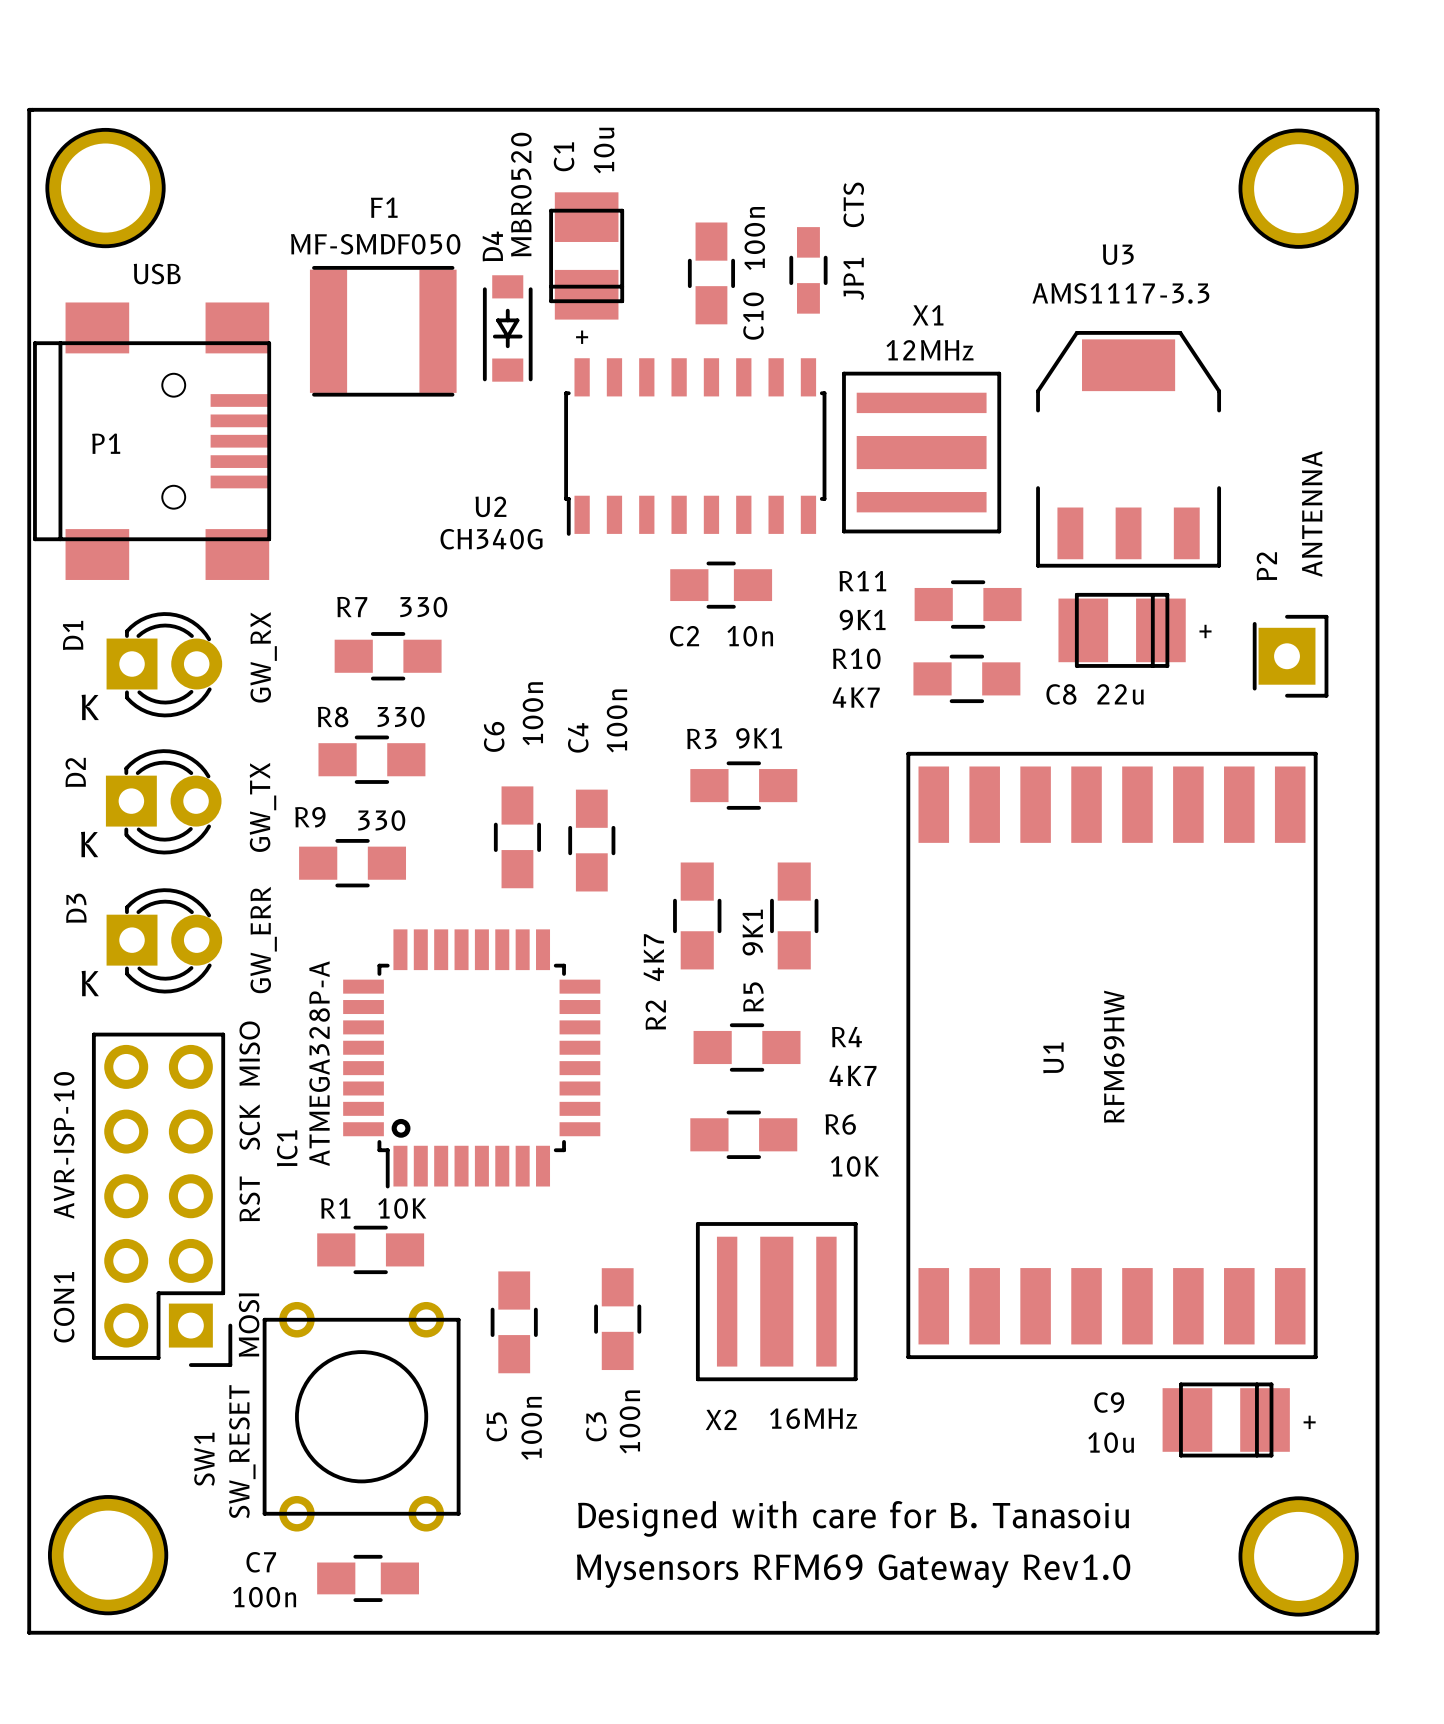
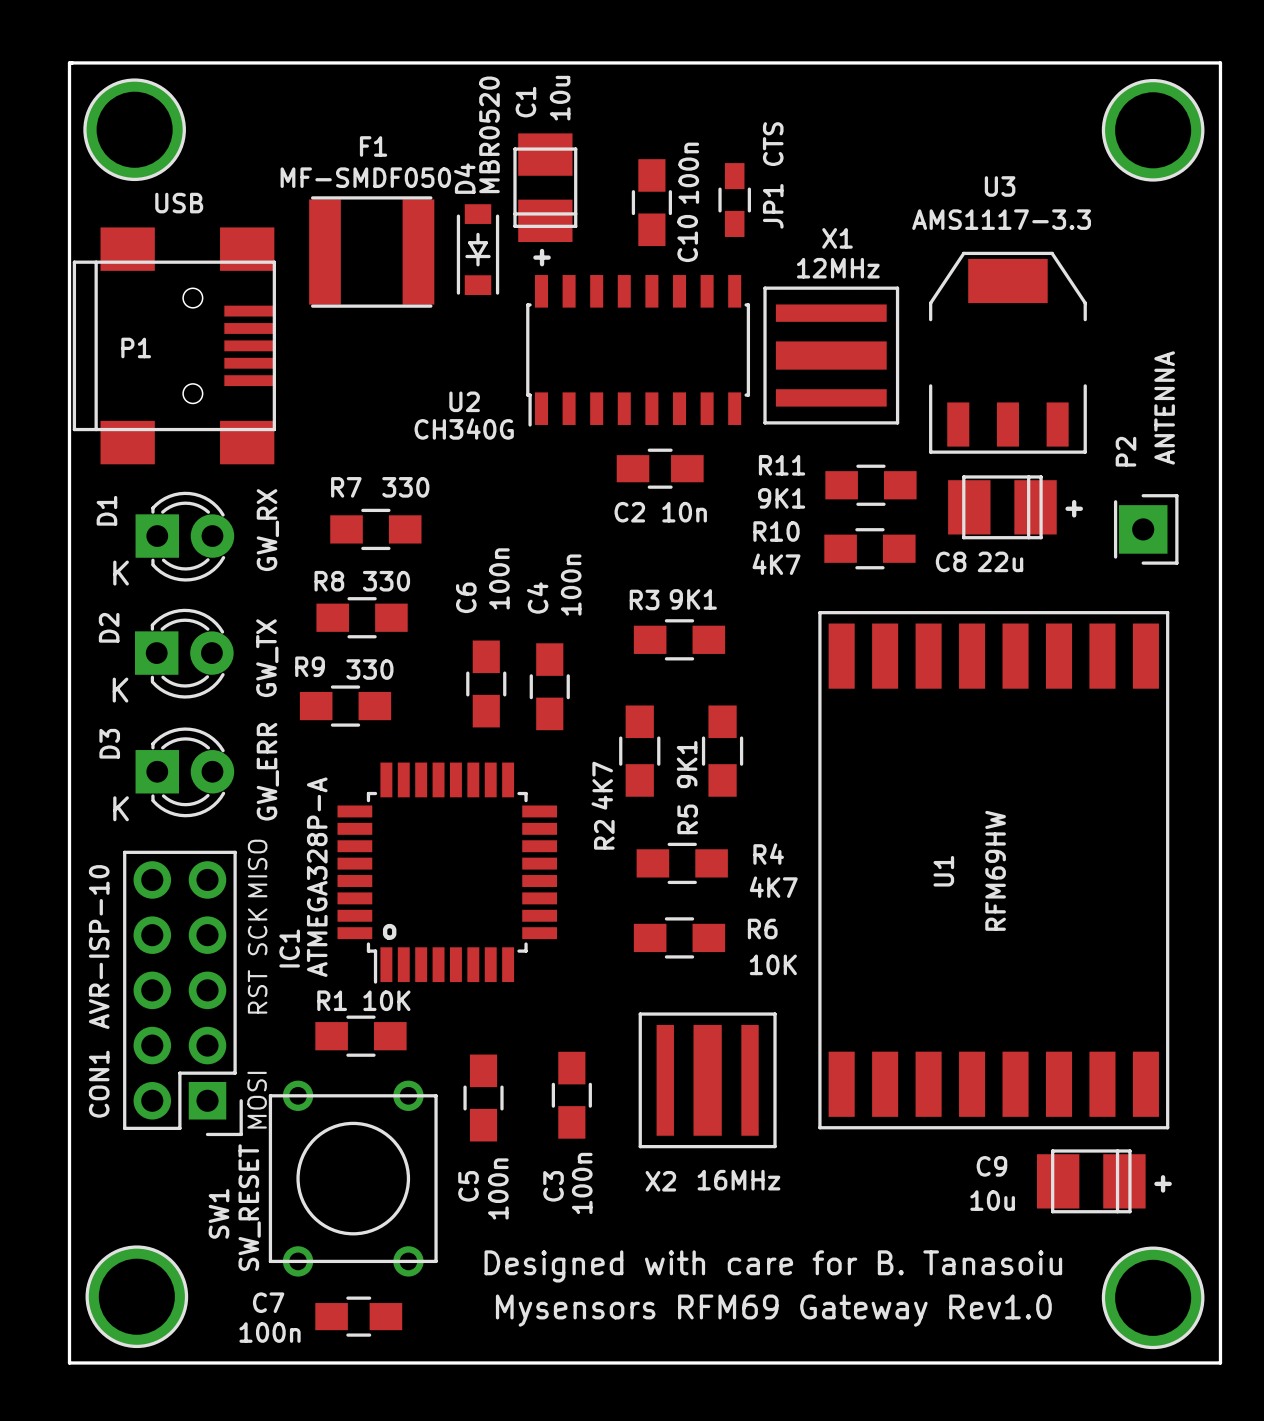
drawing: [391, 1118, 411, 1138] -> none
text: none -> o (389, 931)

